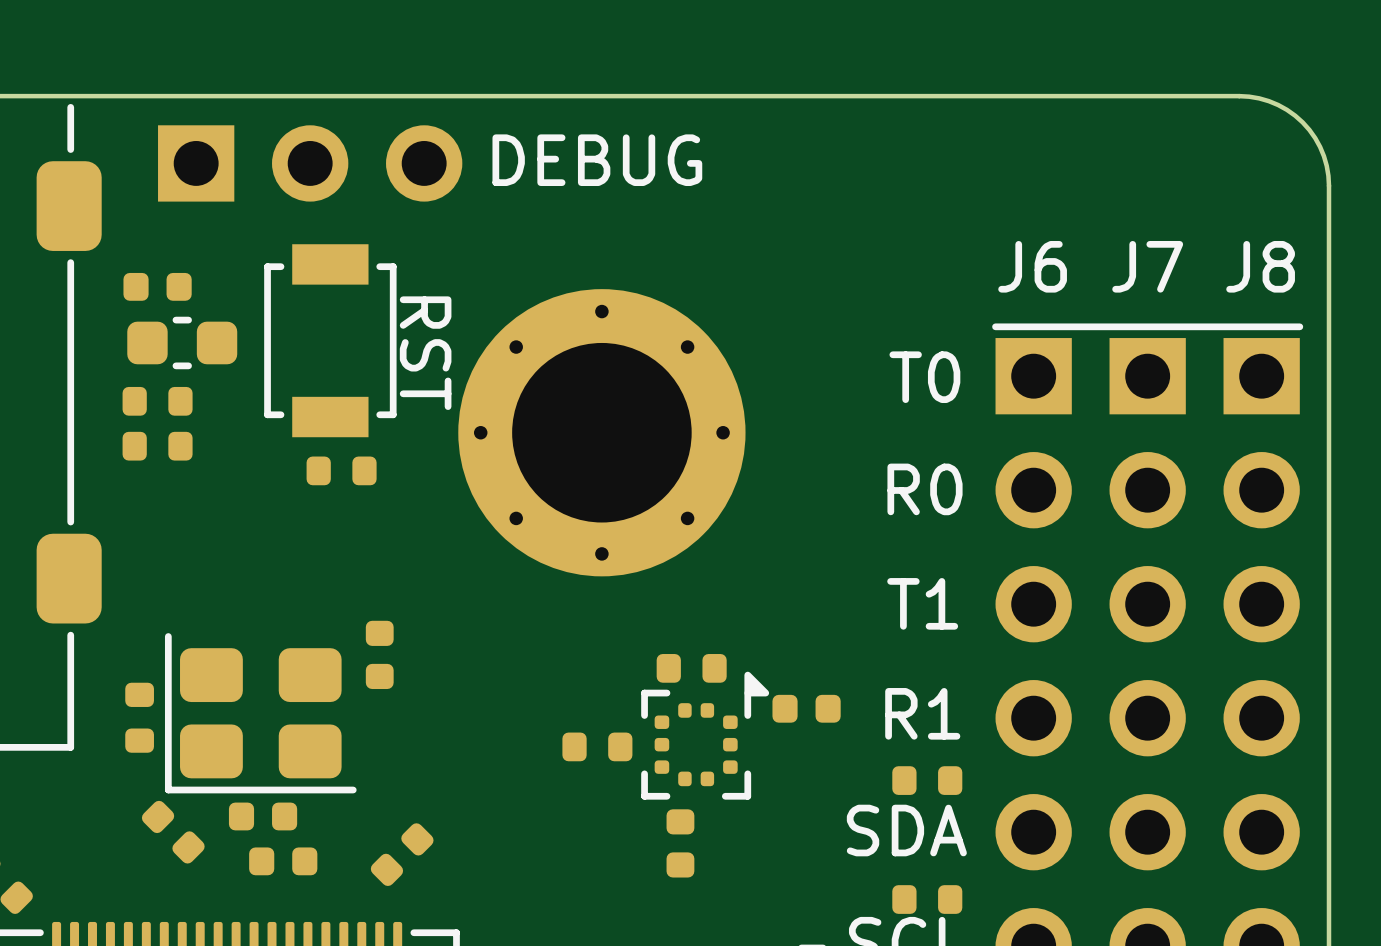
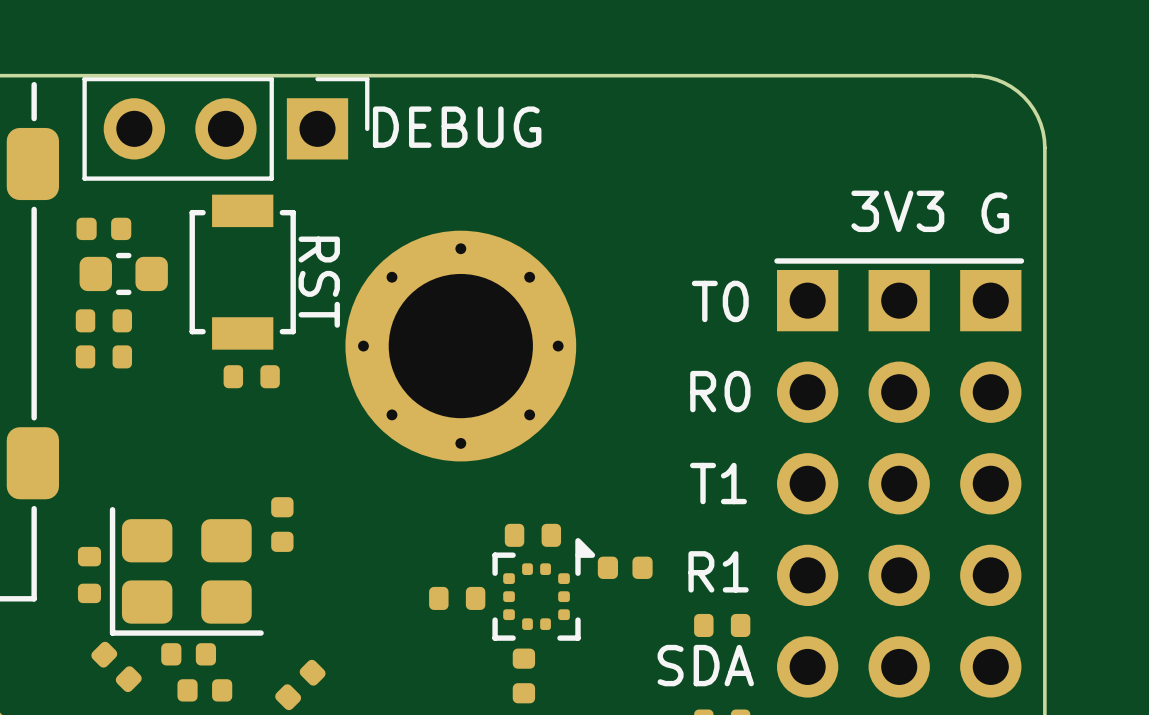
part side: bottom (310, 163) -> top (225, 128)
text: none -> 3V3 (897, 211)
J6 name: J6 (1032, 266) -> none
J7 name: J7 (1147, 266) -> none
J8 name: J8 (1260, 266) -> none
text: none -> G (995, 213)

